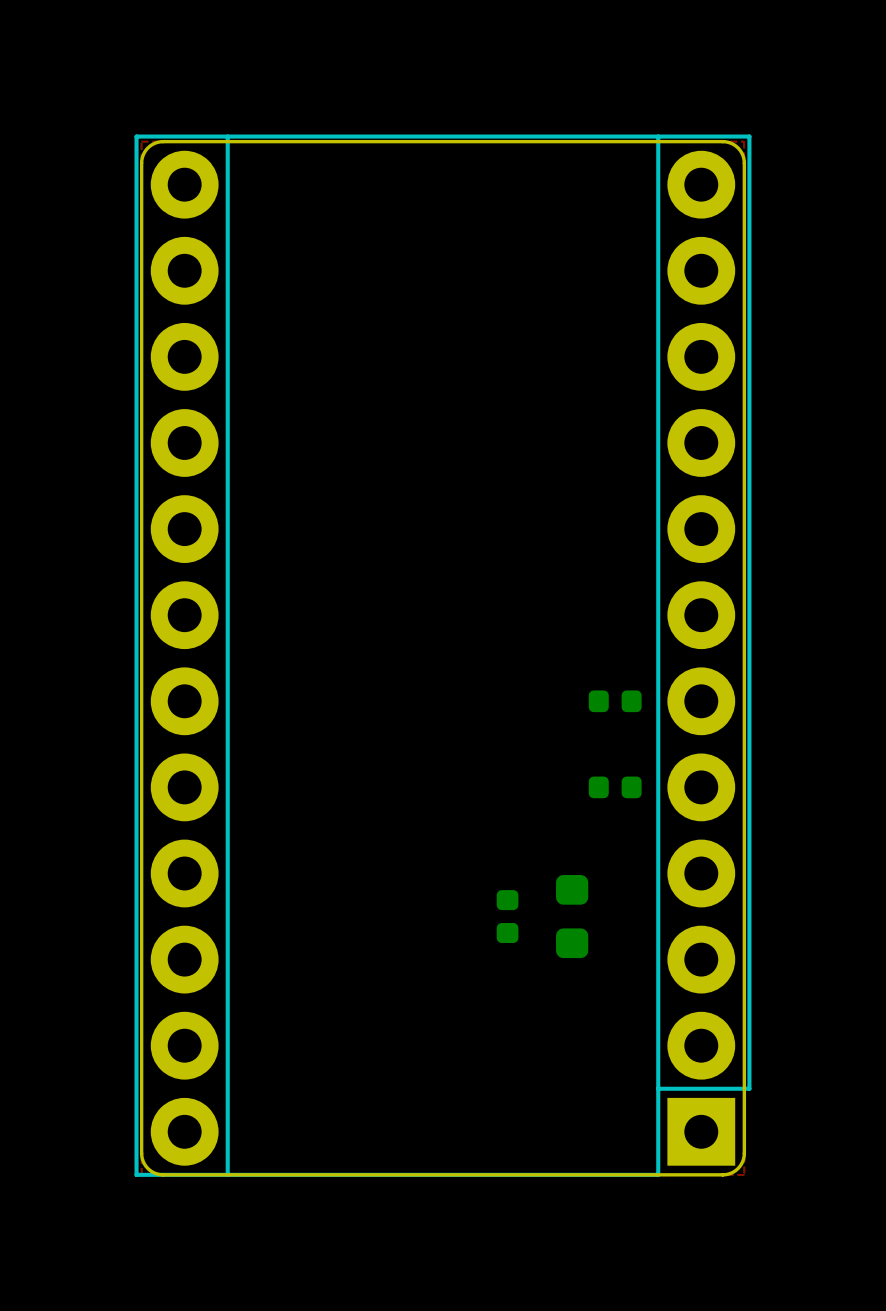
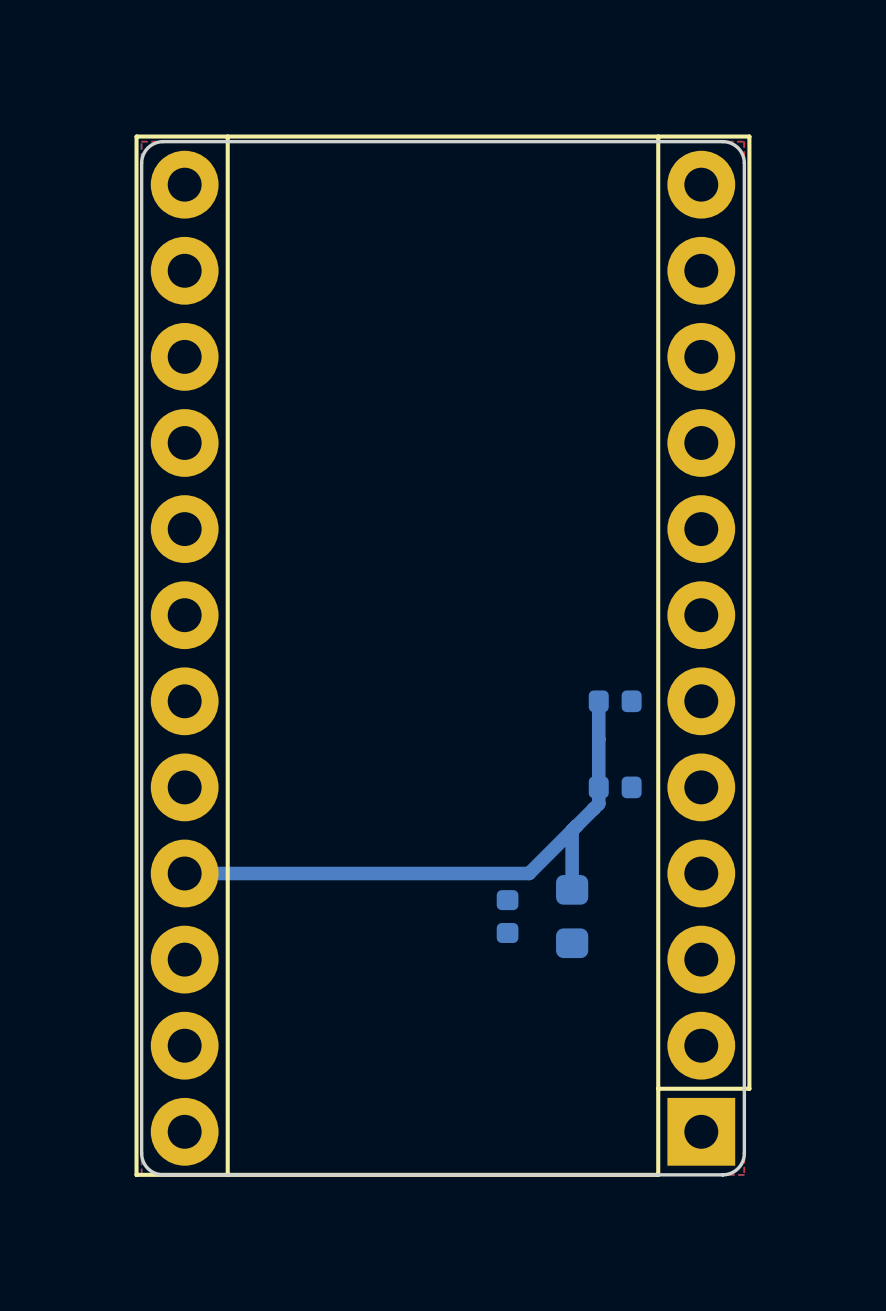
bottom track: none -> (598, 701) (598, 803) (529, 873) (184, 873)
bottom track: none -> (572, 830) (572, 889)

